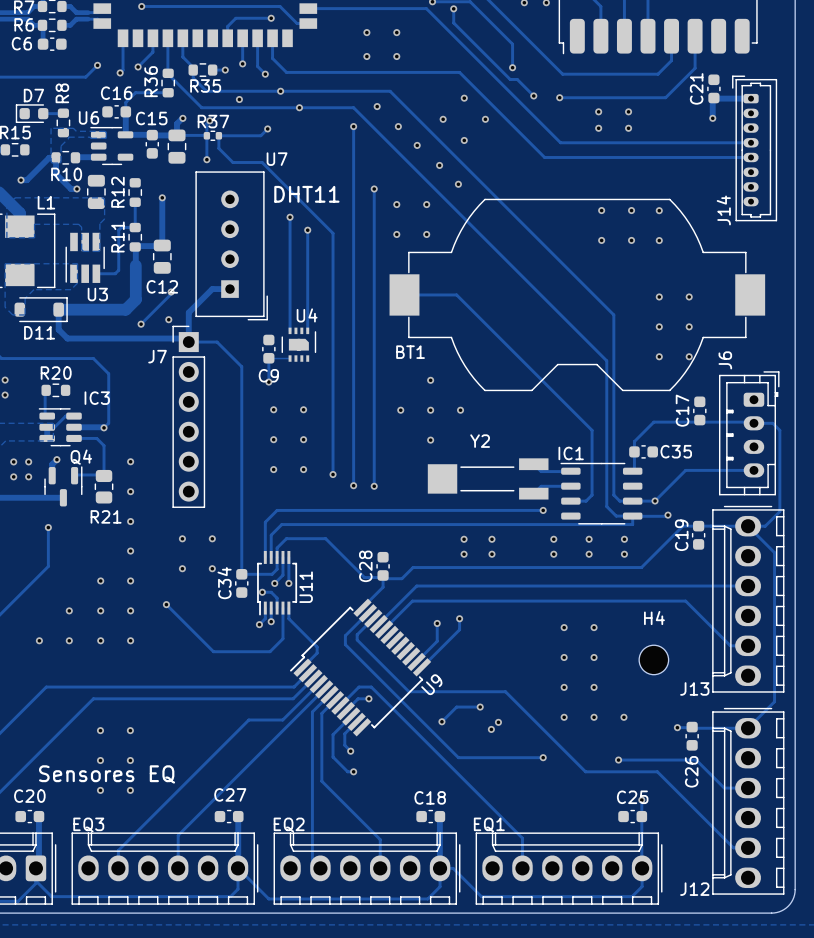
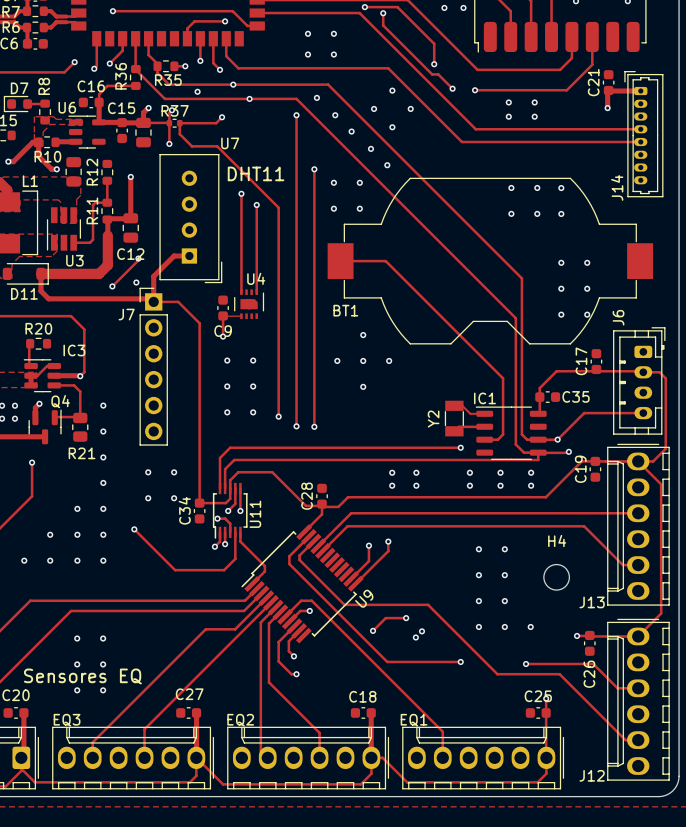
Y2 name position: Y2 (480, 441) -> Y2 (433, 419)
Y2 footprint: [427, 458, 549, 500] -> [444, 400, 464, 437]
track: none -> (454, 405) (462, 405) (470, 413) (484, 413)
track: (533, 464) (541, 471) (570, 471) -> none

